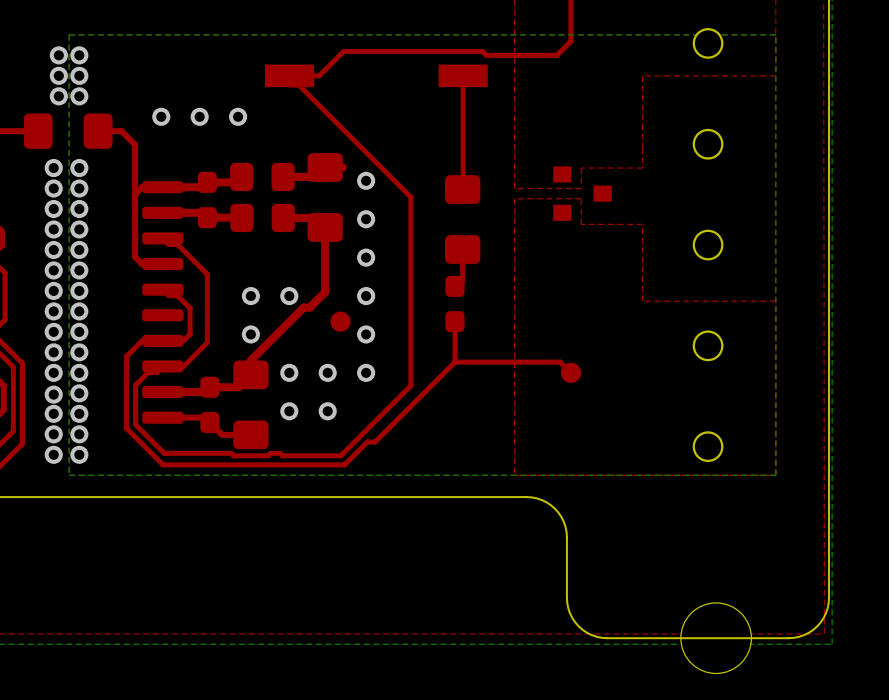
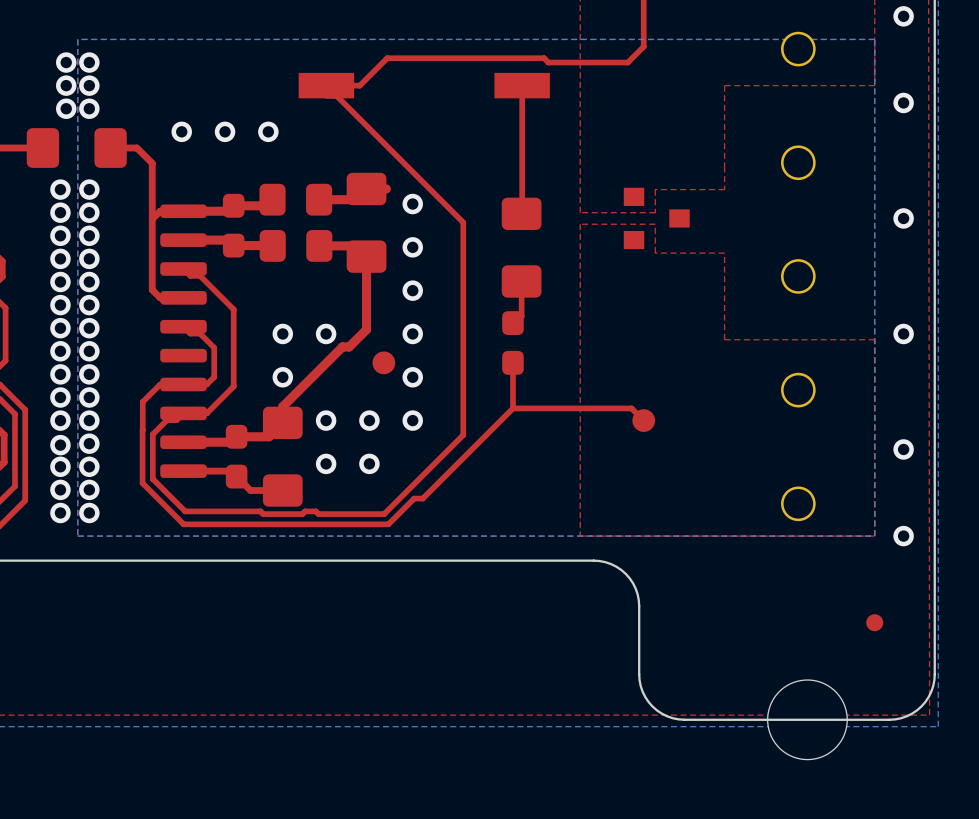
via: none -> (903, 16)
via: none -> (903, 102)
via: none -> (903, 218)
via: none -> (903, 333)
via: none -> (903, 449)
via: none -> (903, 536)
part: none -> (874, 622)

